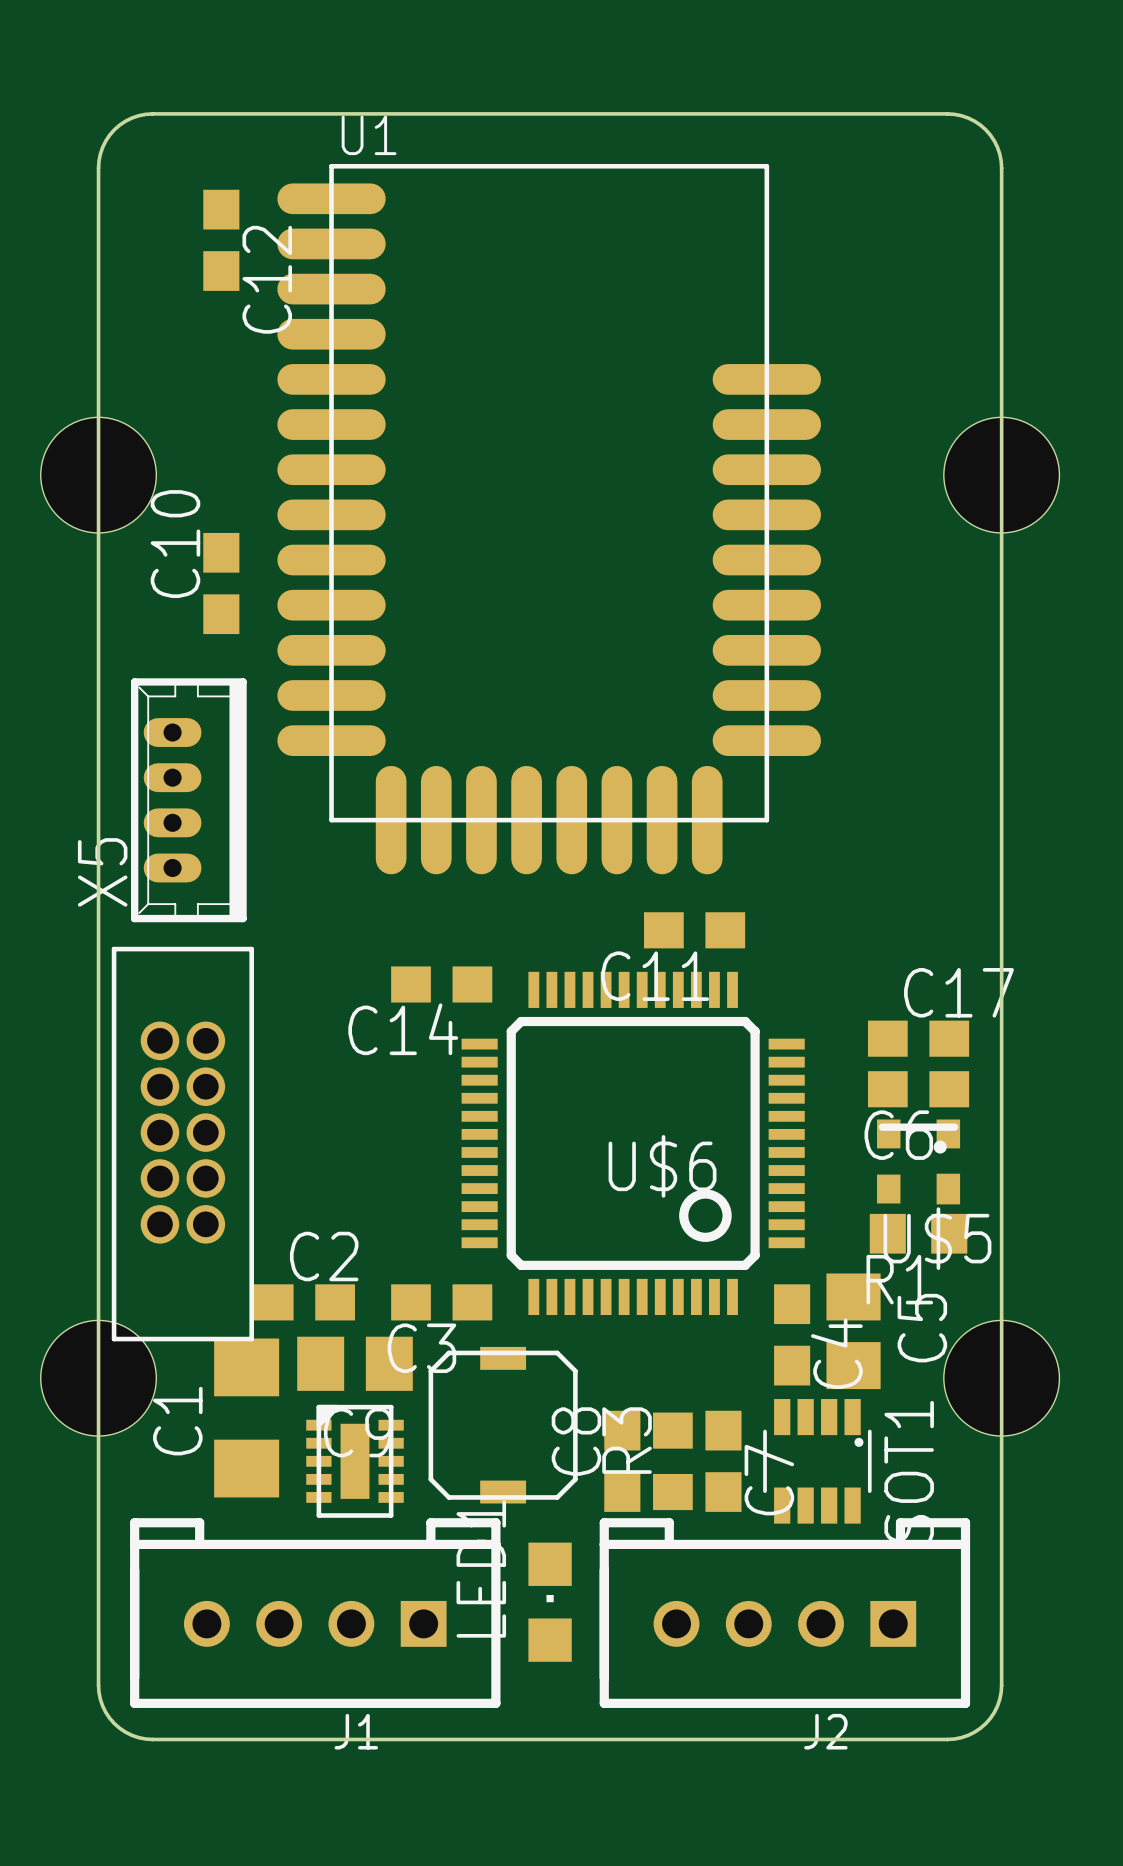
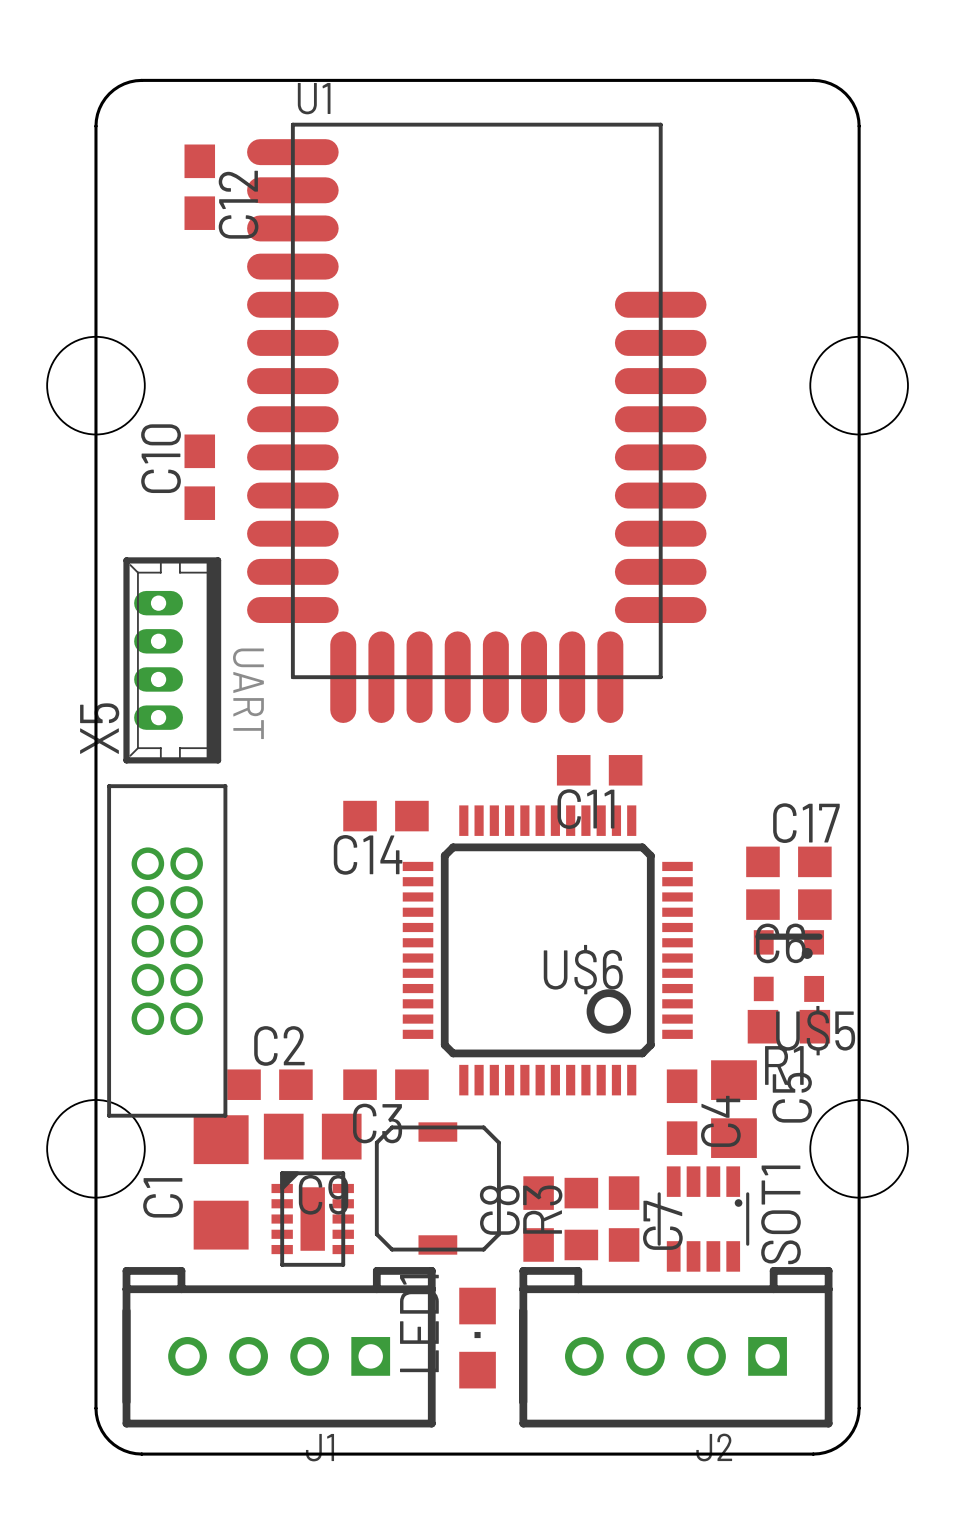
text: none -> UART (248, 693)

